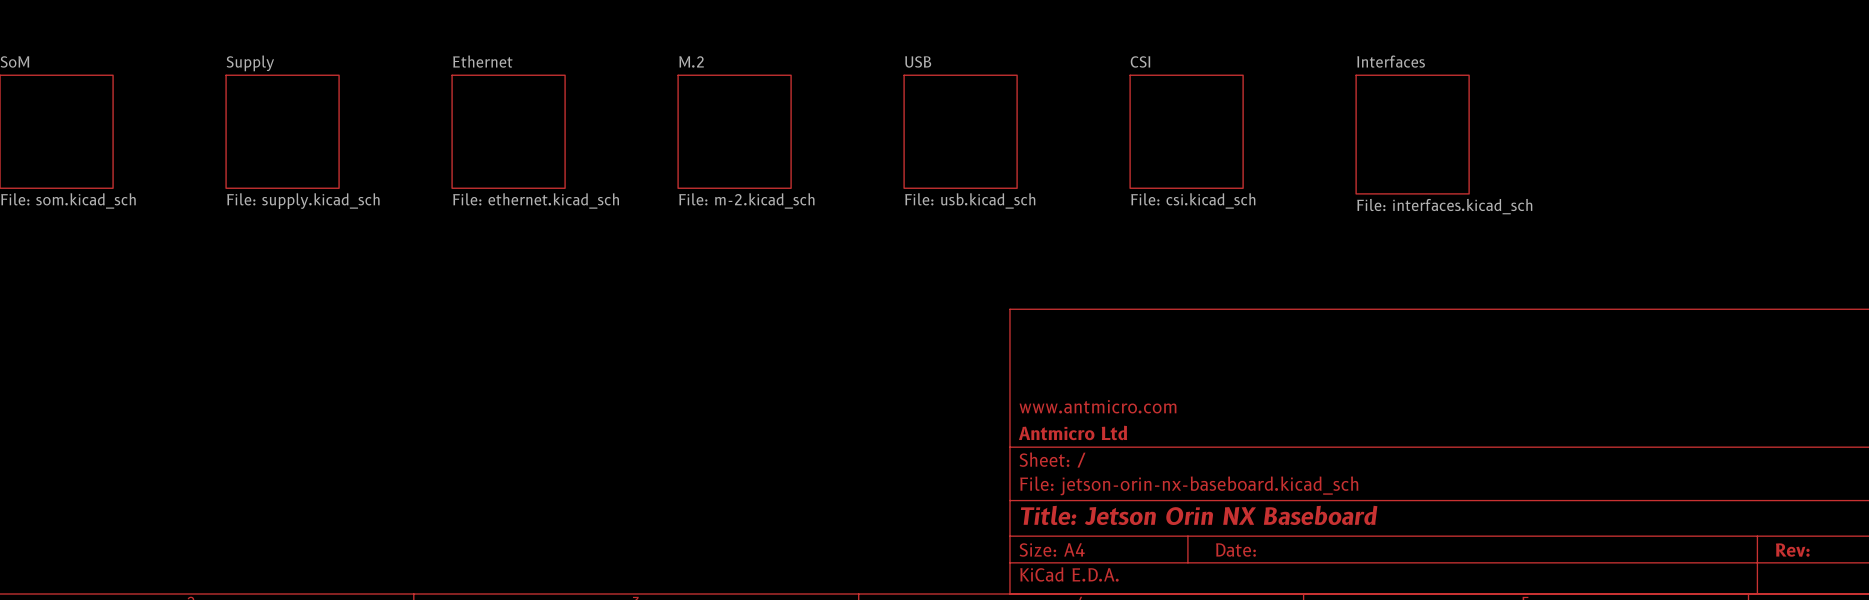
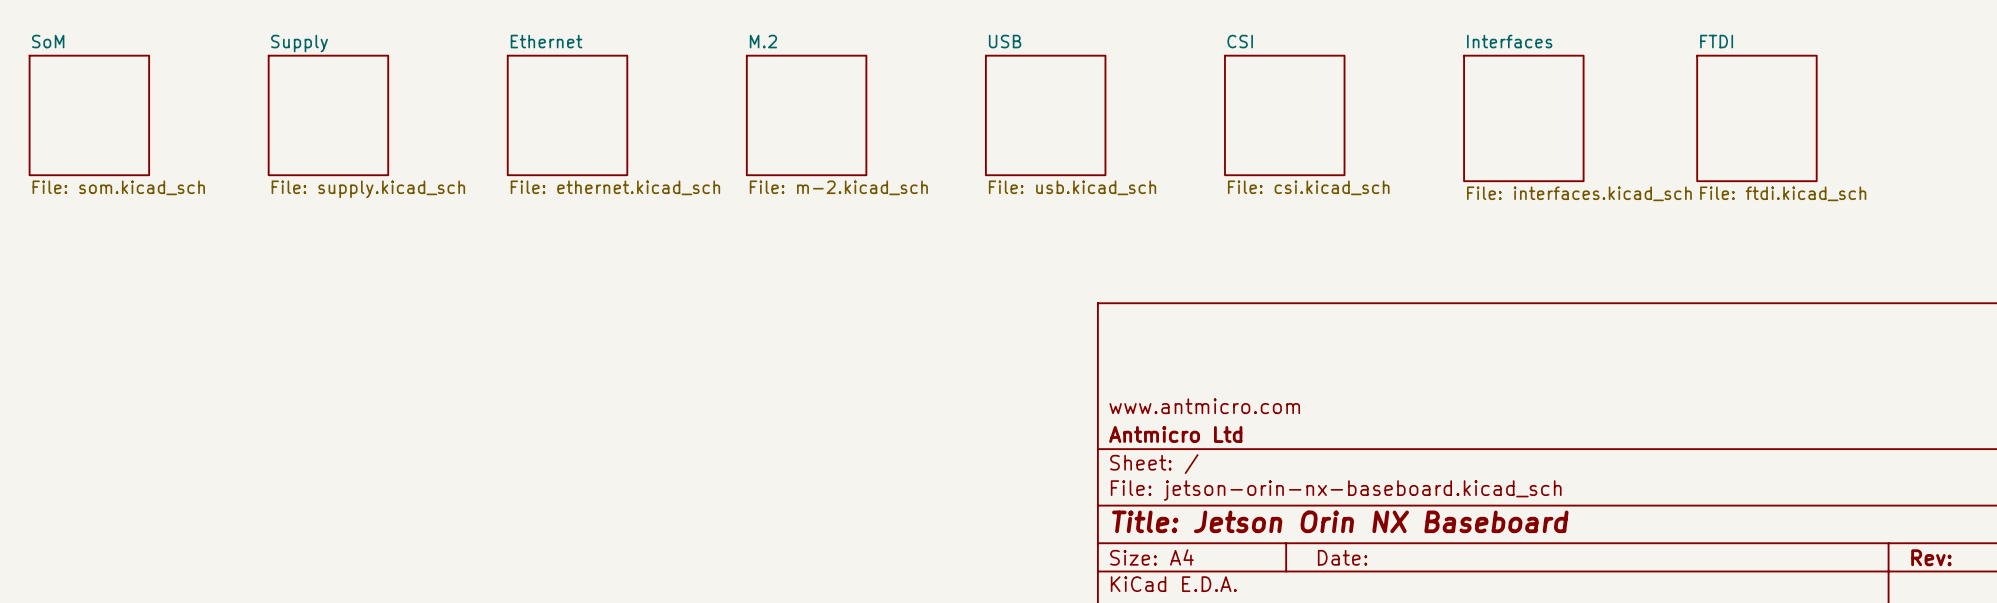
sheet FTDI: none -> File: ftdi.kicad_sch (1756, 118)

